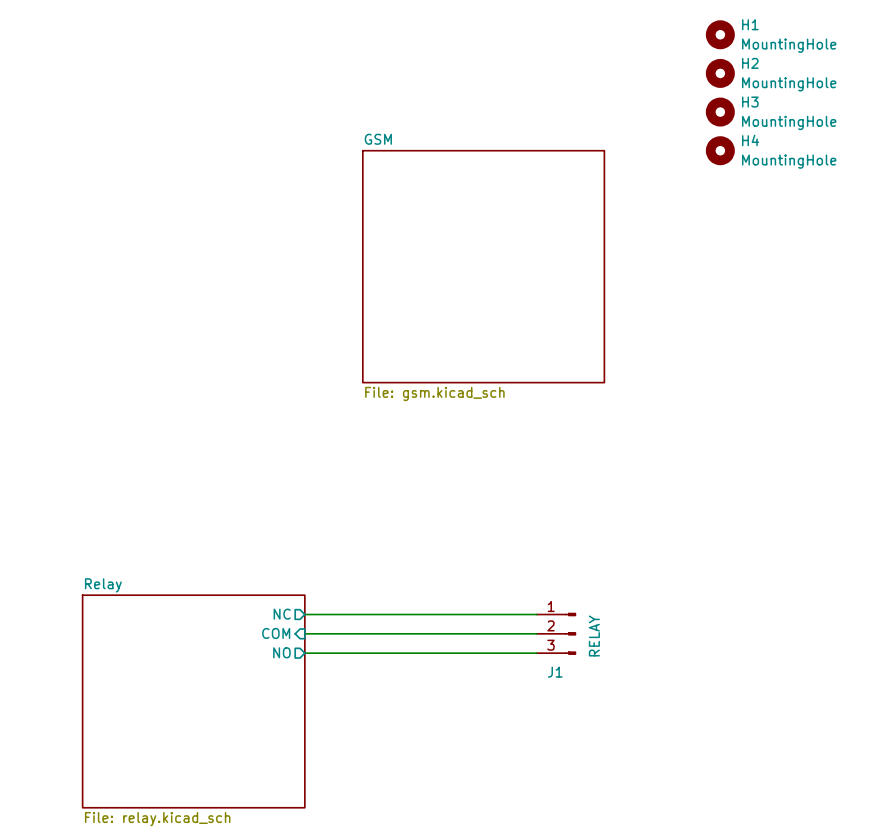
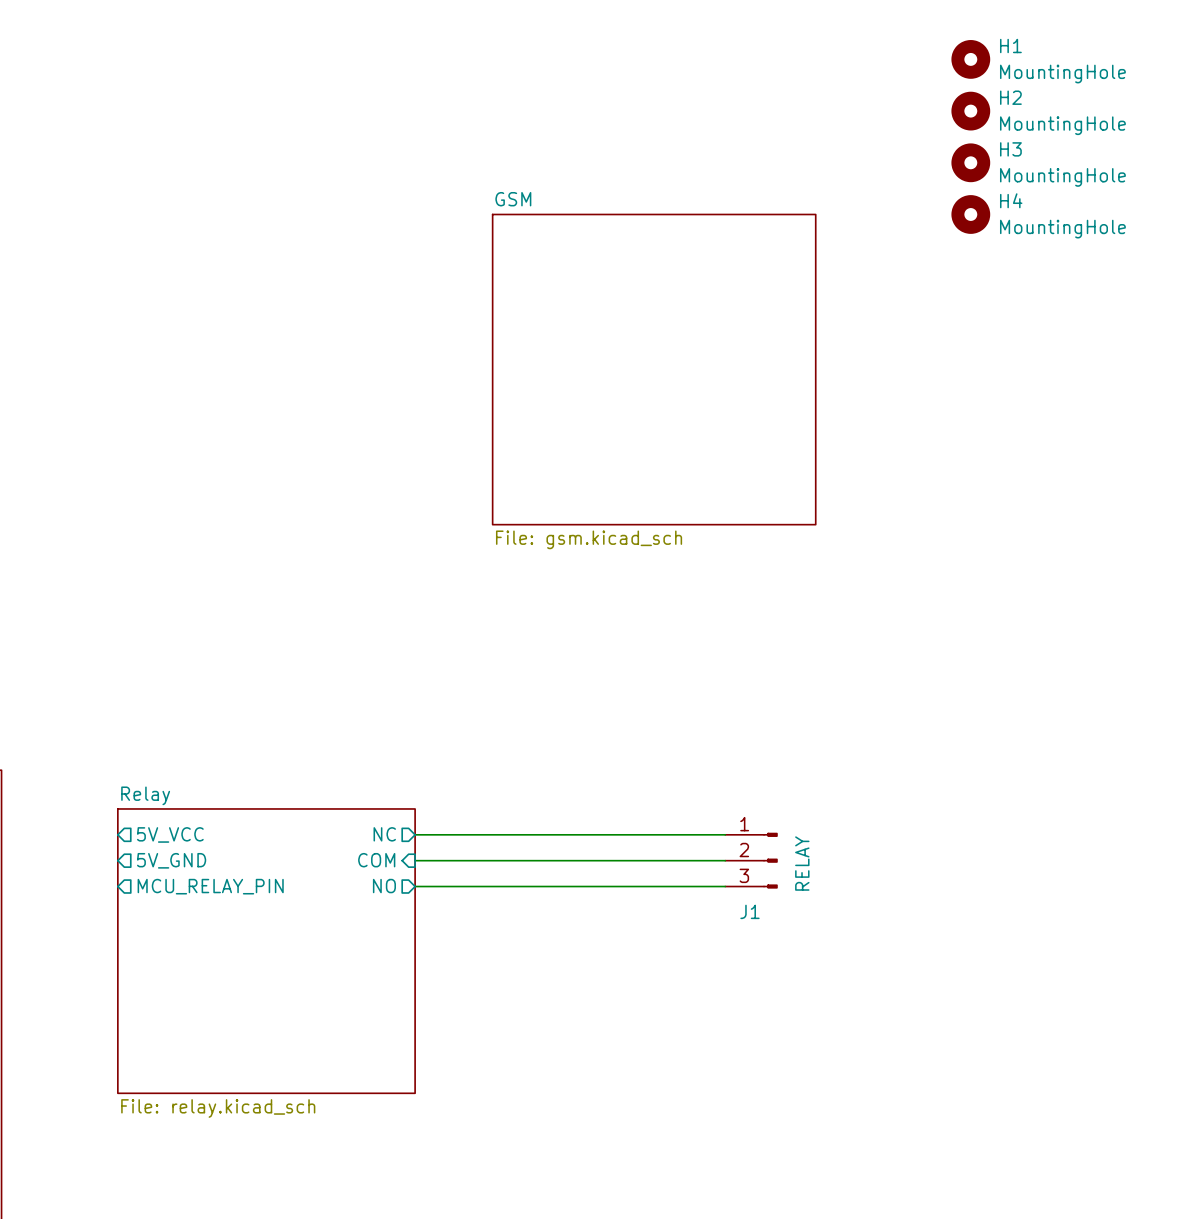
sheet pin: none -> 5V_VCC (170, 834)
sheet pin: none -> 5V_GND (171, 860)
sheet pin: none -> MCU_RELAY_PIN (210, 886)

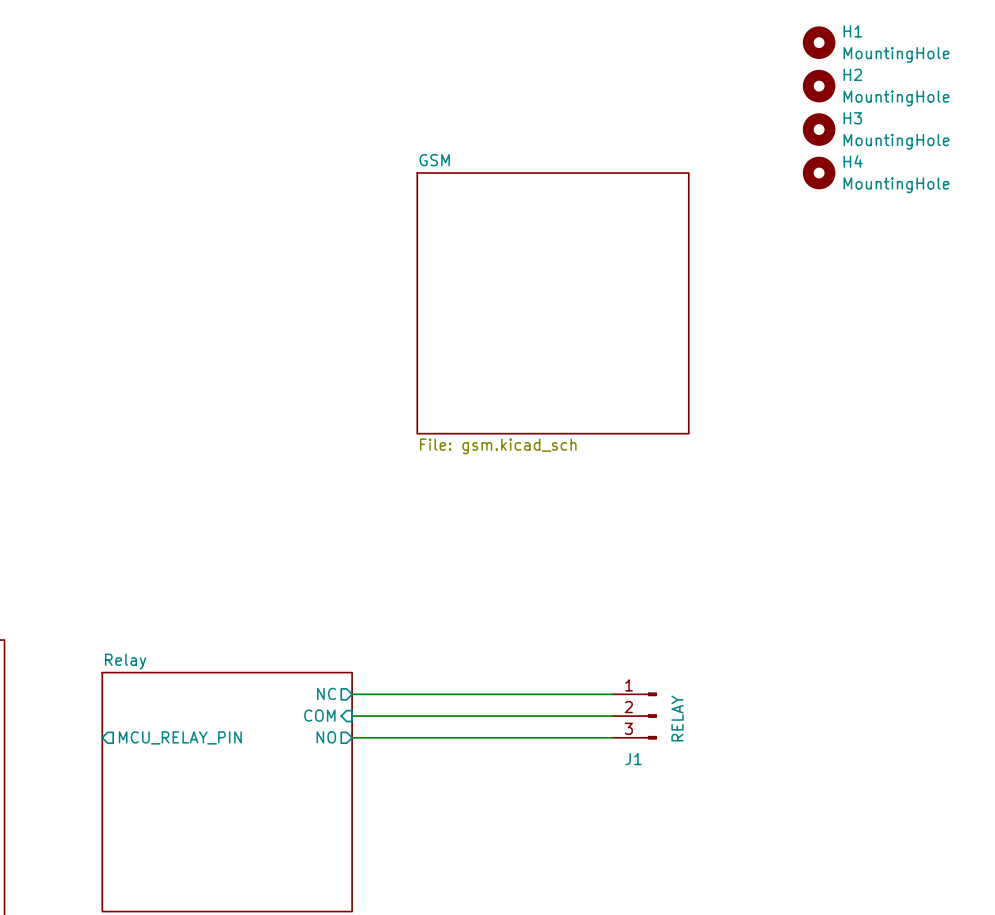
sheet pin: 5V_VCC (170, 834) -> none
sheet pin: 5V_GND (171, 860) -> none

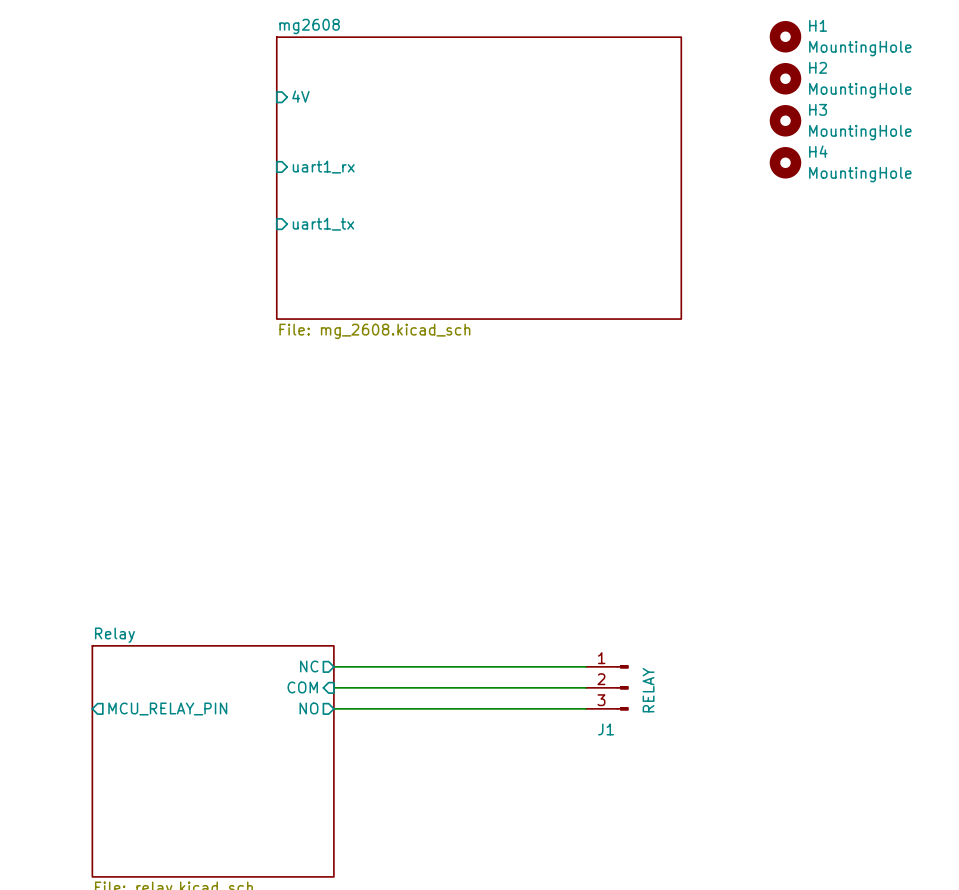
sheet pin: none -> 4V (300, 96)
sheet pin: none -> uart1_rx (323, 167)
sheet mg2608: none -> File: mg_2608.kicad_sch (479, 178)
sheet pin: none -> uart1_tx (323, 224)
sheet GSM: File: gsm.kicad_sch (553, 303) -> none

